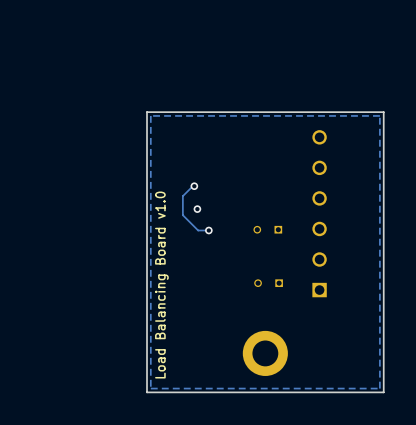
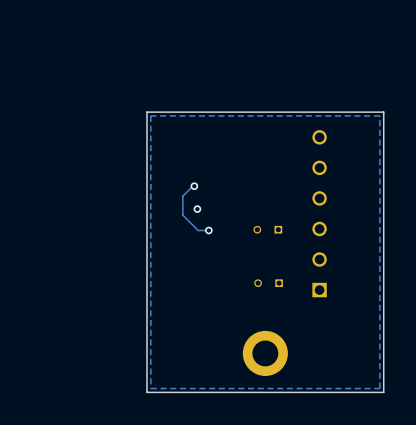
text: Load Balancing Board v1.0 (161, 285) -> none

